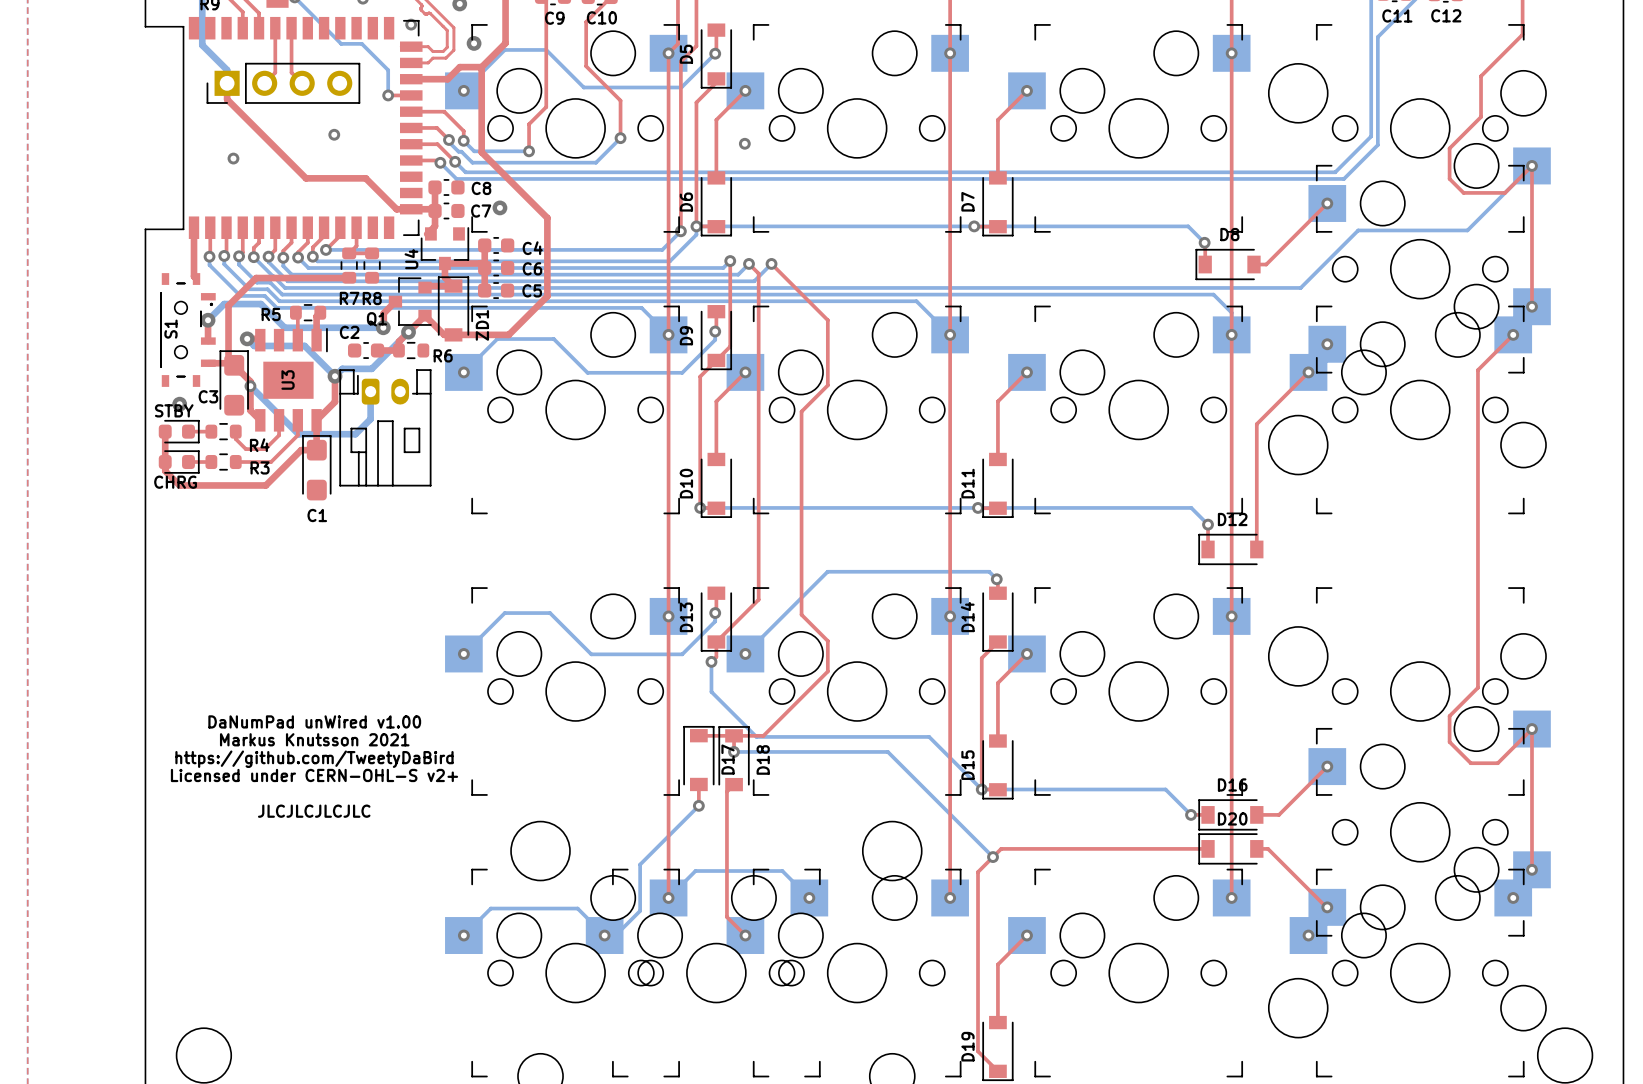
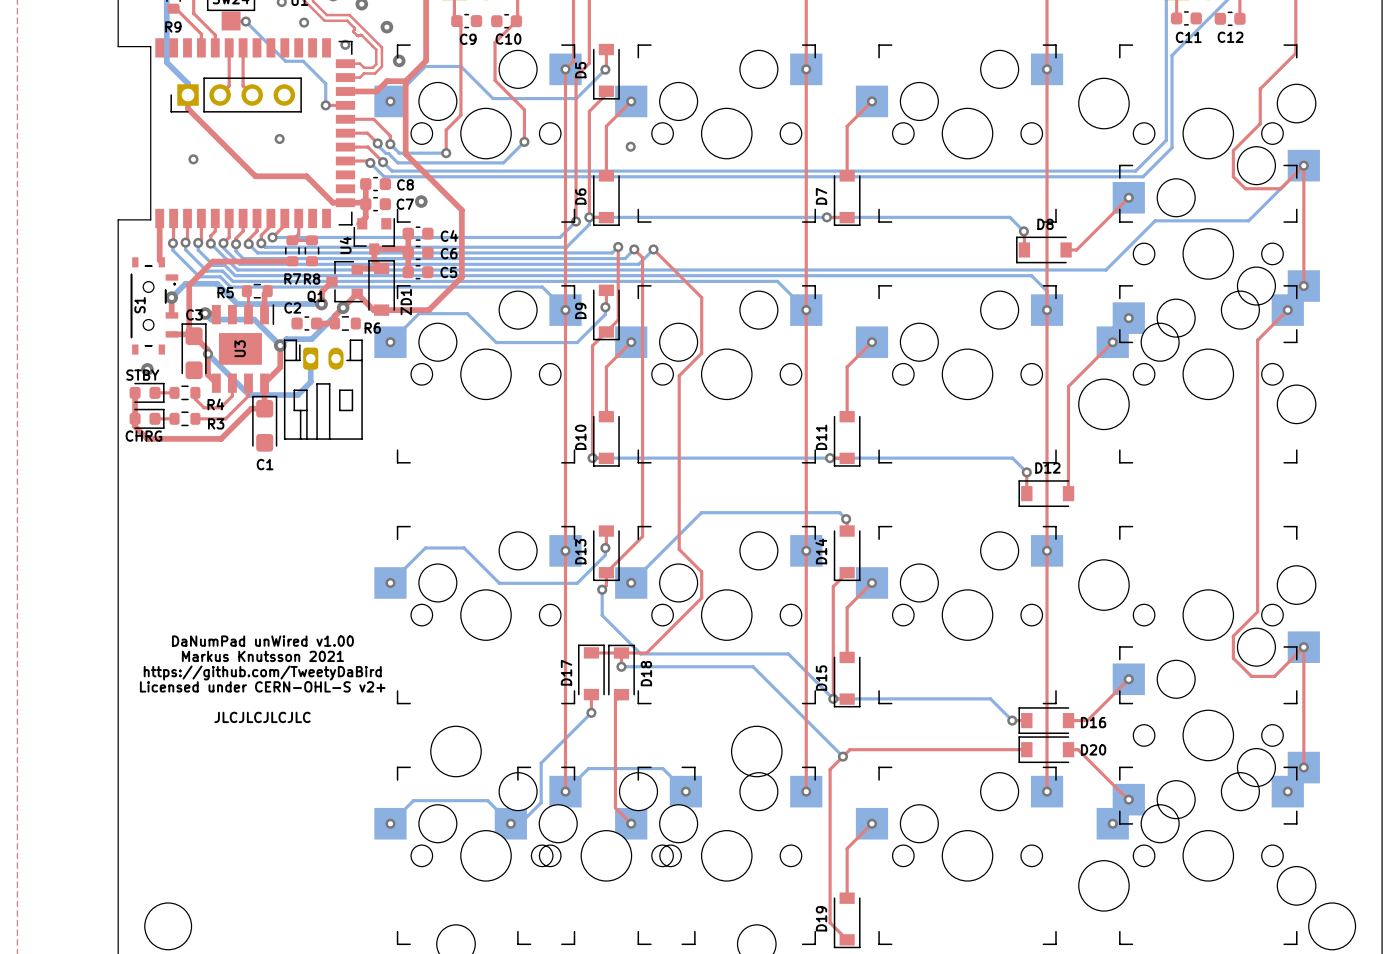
C3 name position: C3 (208, 396) -> C3 (194, 314)
D17 name position: D17 (728, 759) -> D17 (566, 672)
D16 name position: D16 (1232, 784) -> D16 (1093, 722)
D20 name position: D20 (1232, 818) -> D20 (1093, 749)

